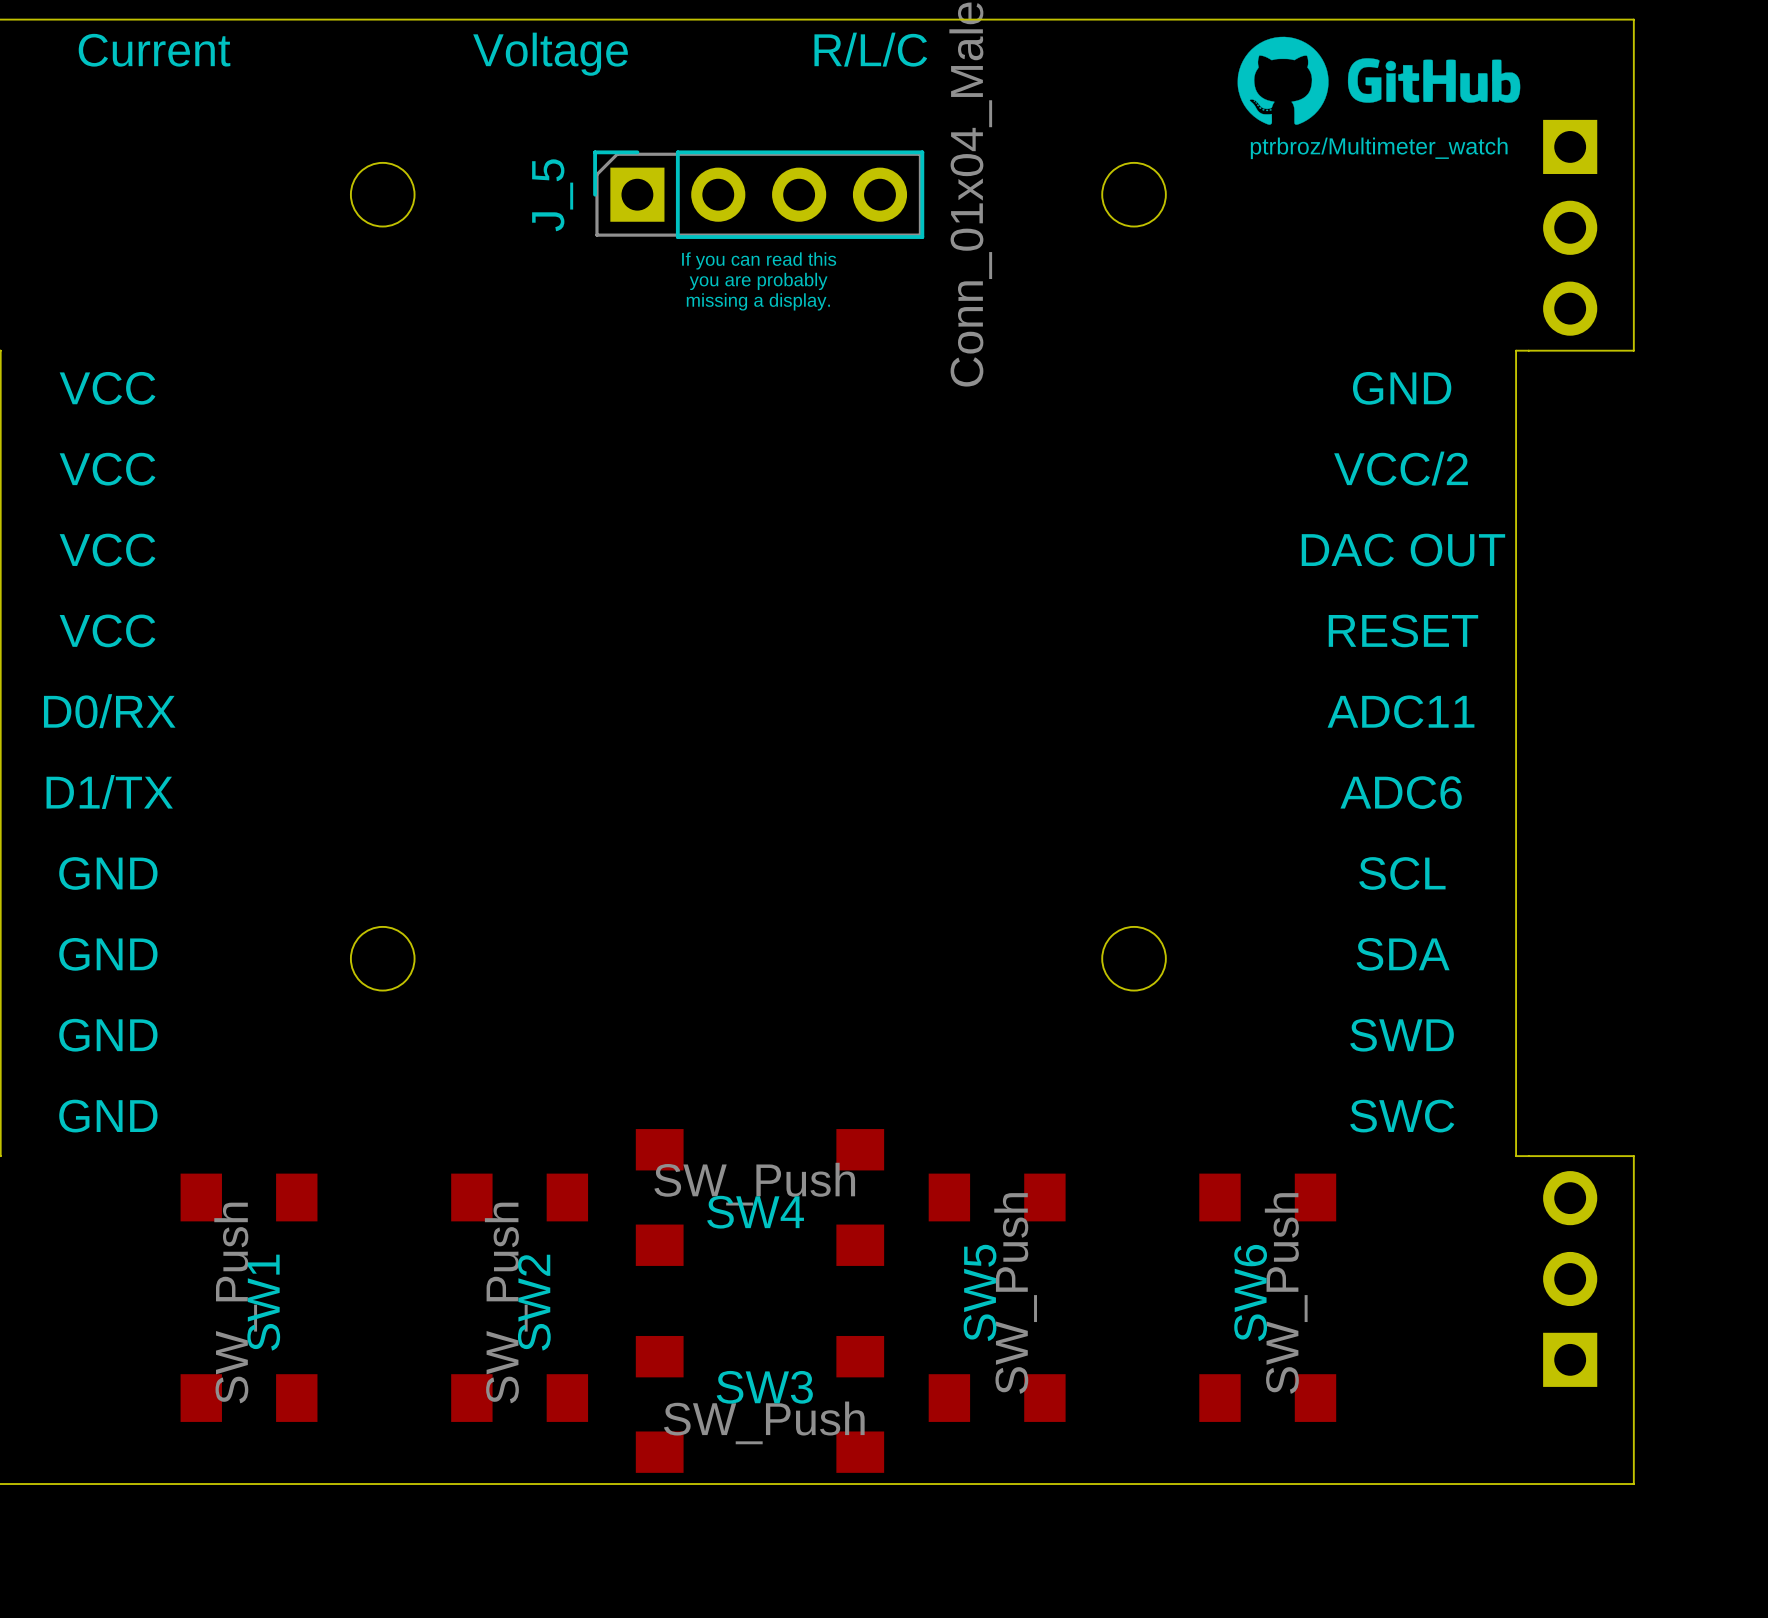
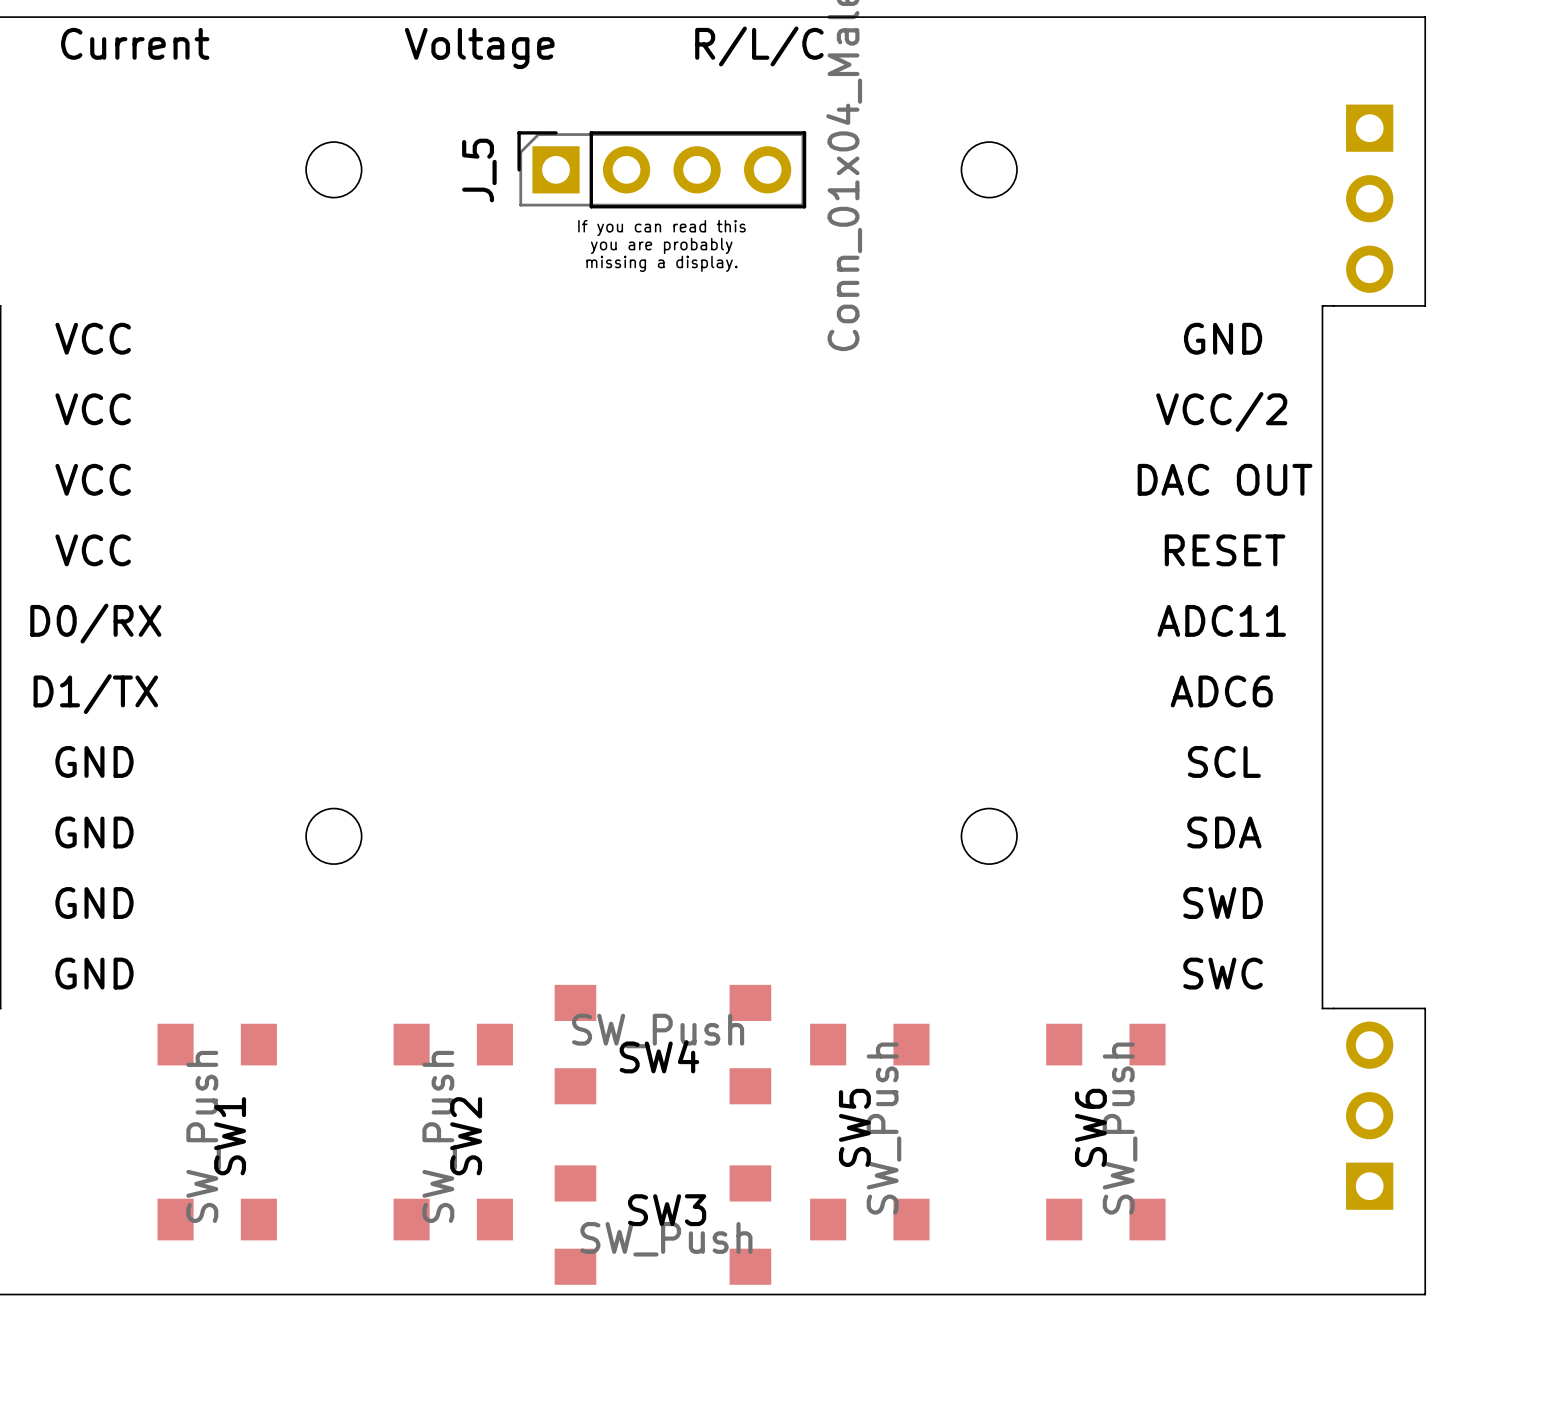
drawing: [1237, 36, 1521, 125] -> none
text: ptrbroz/Multimeter_watch (1379, 148) -> none

